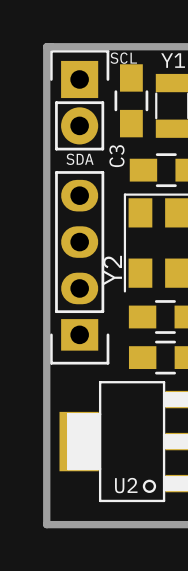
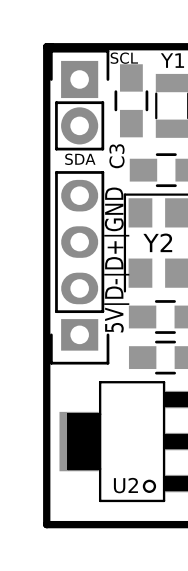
text: none -> 5V|D-|D+|GND (116, 259)
Y2 name rotation: 0° (112, 270) -> 90° clockwise (157, 242)
Y2 name position: Y2 (112, 270) -> Y2 (157, 242)

